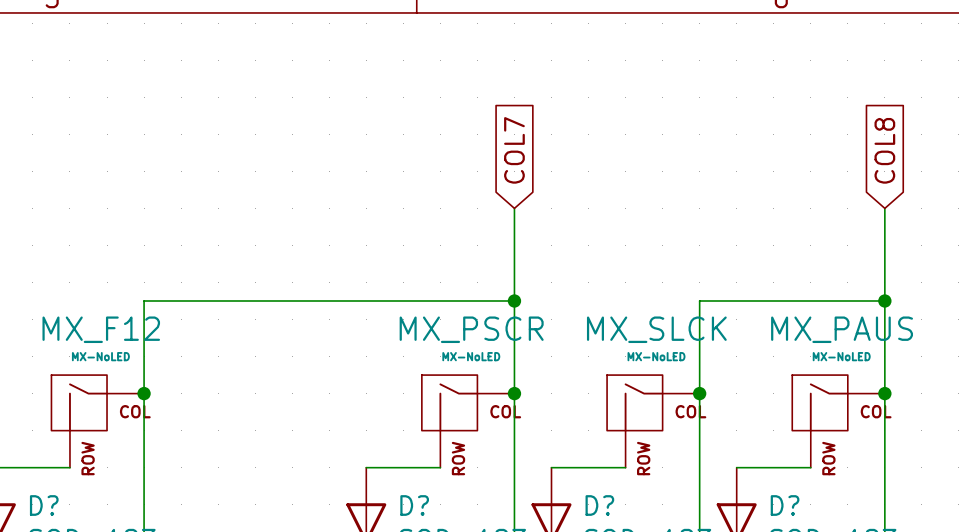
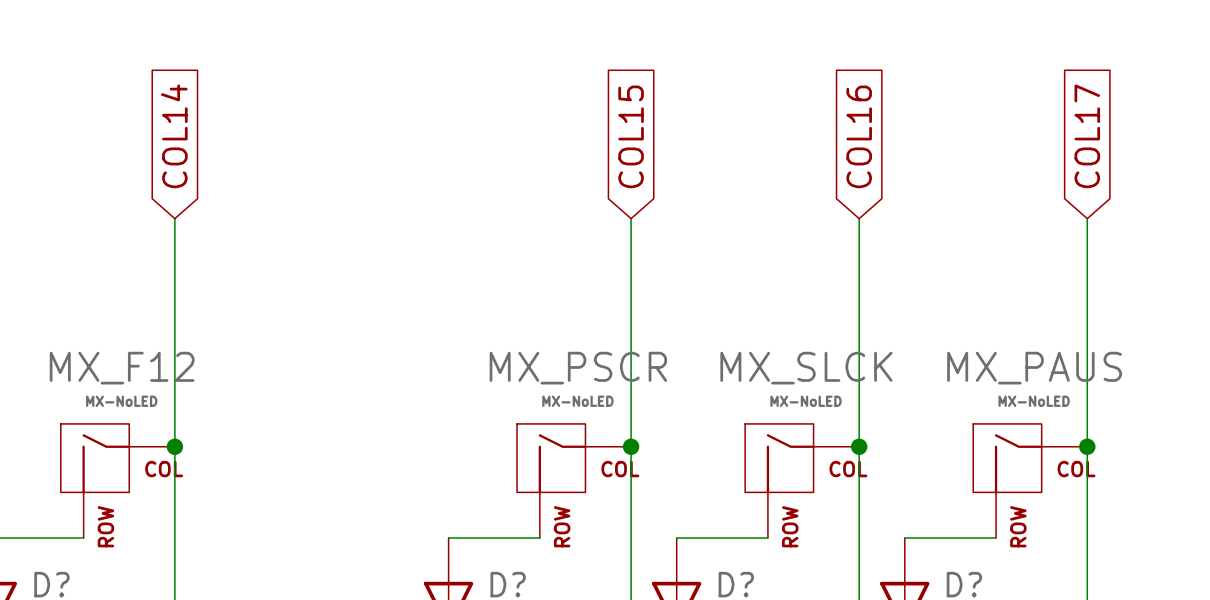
global label: none -> COL14 (174, 136)
global label: none -> COL16 (859, 136)
global label: COL7 (514, 150) -> COL15 (631, 136)
global label: COL8 (884, 150) -> COL17 (1087, 136)
wire: (144, 300) (514, 300) -> (174, 332) (174, 218)
junction: (514, 300) -> none
wire: (699, 300) (884, 300) -> (859, 332) (859, 218)
junction: (884, 300) -> none

